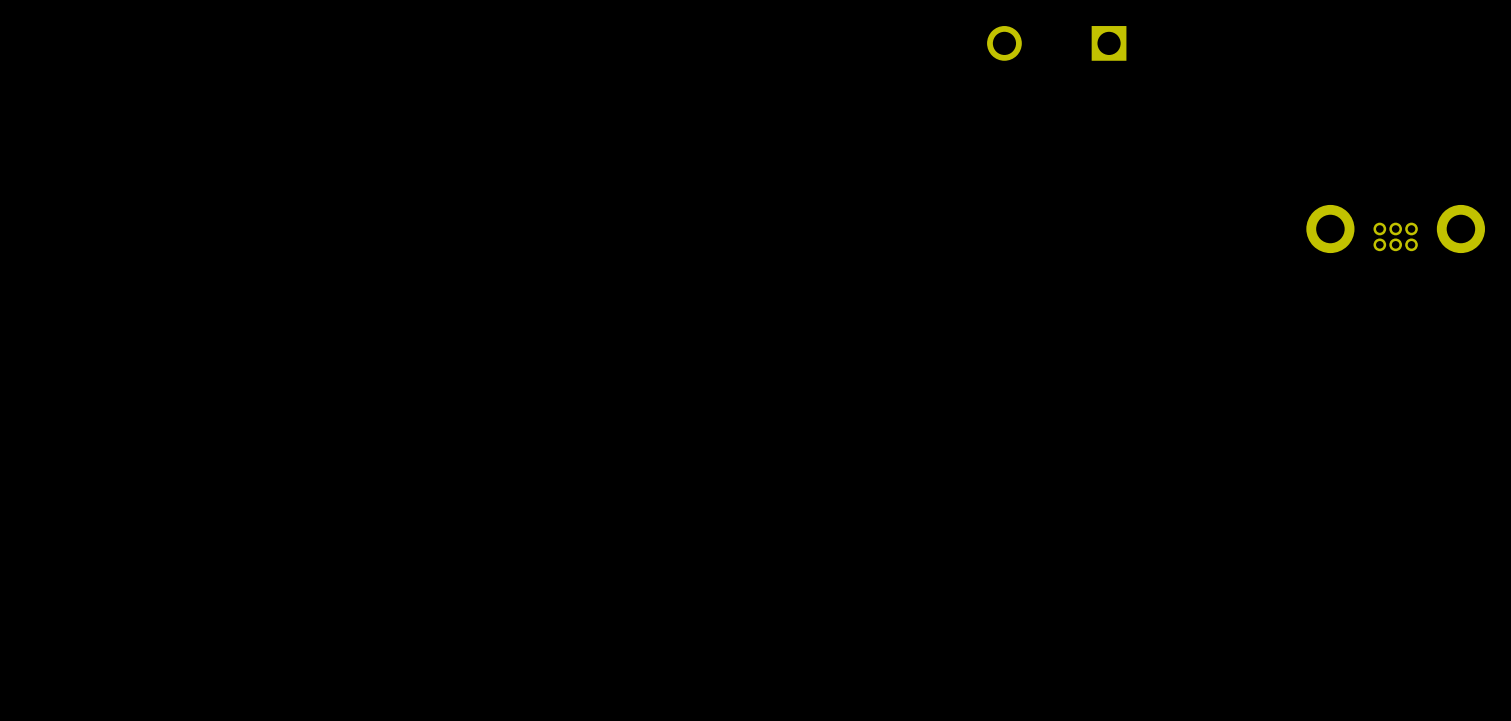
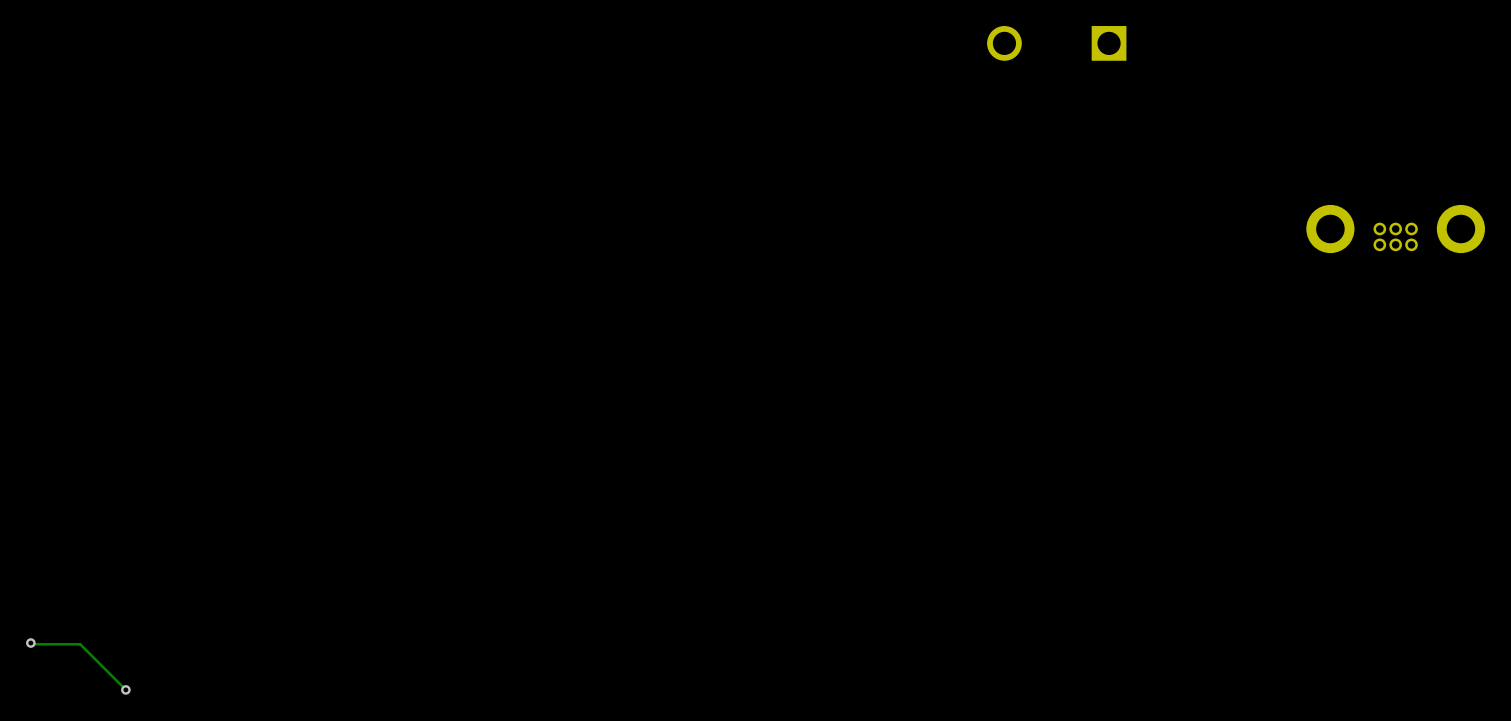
track: none -> (30, 643) (80, 644) (125, 689)
via: none -> (30, 643)
via: none -> (125, 689)

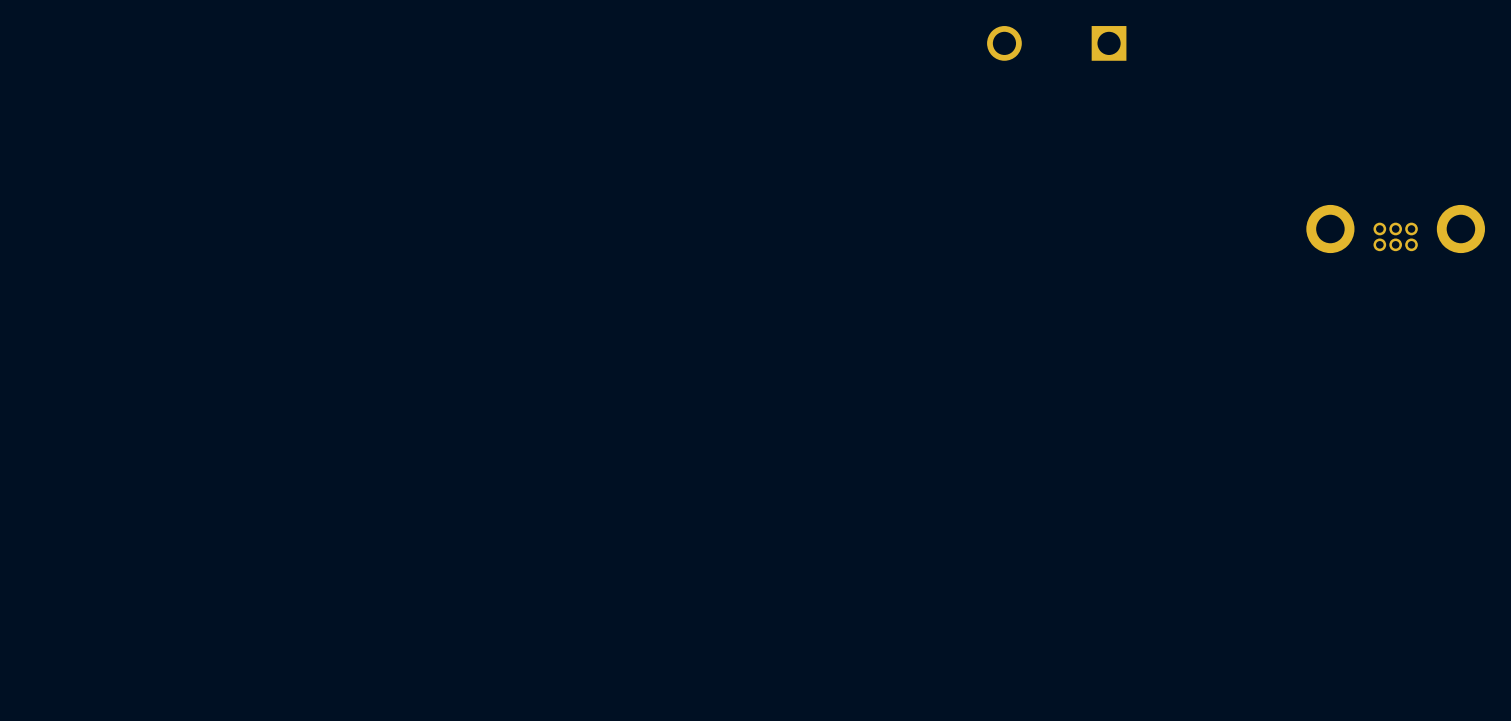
track: (30, 643) (80, 644) (125, 689) -> none
via: (30, 643) -> none
via: (125, 689) -> none

